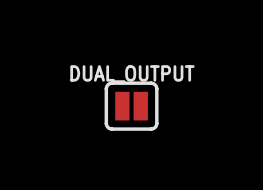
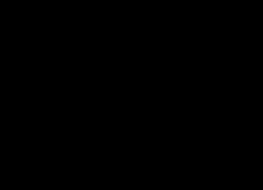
DUAL_OUTPUT: (131, 106) -> none

